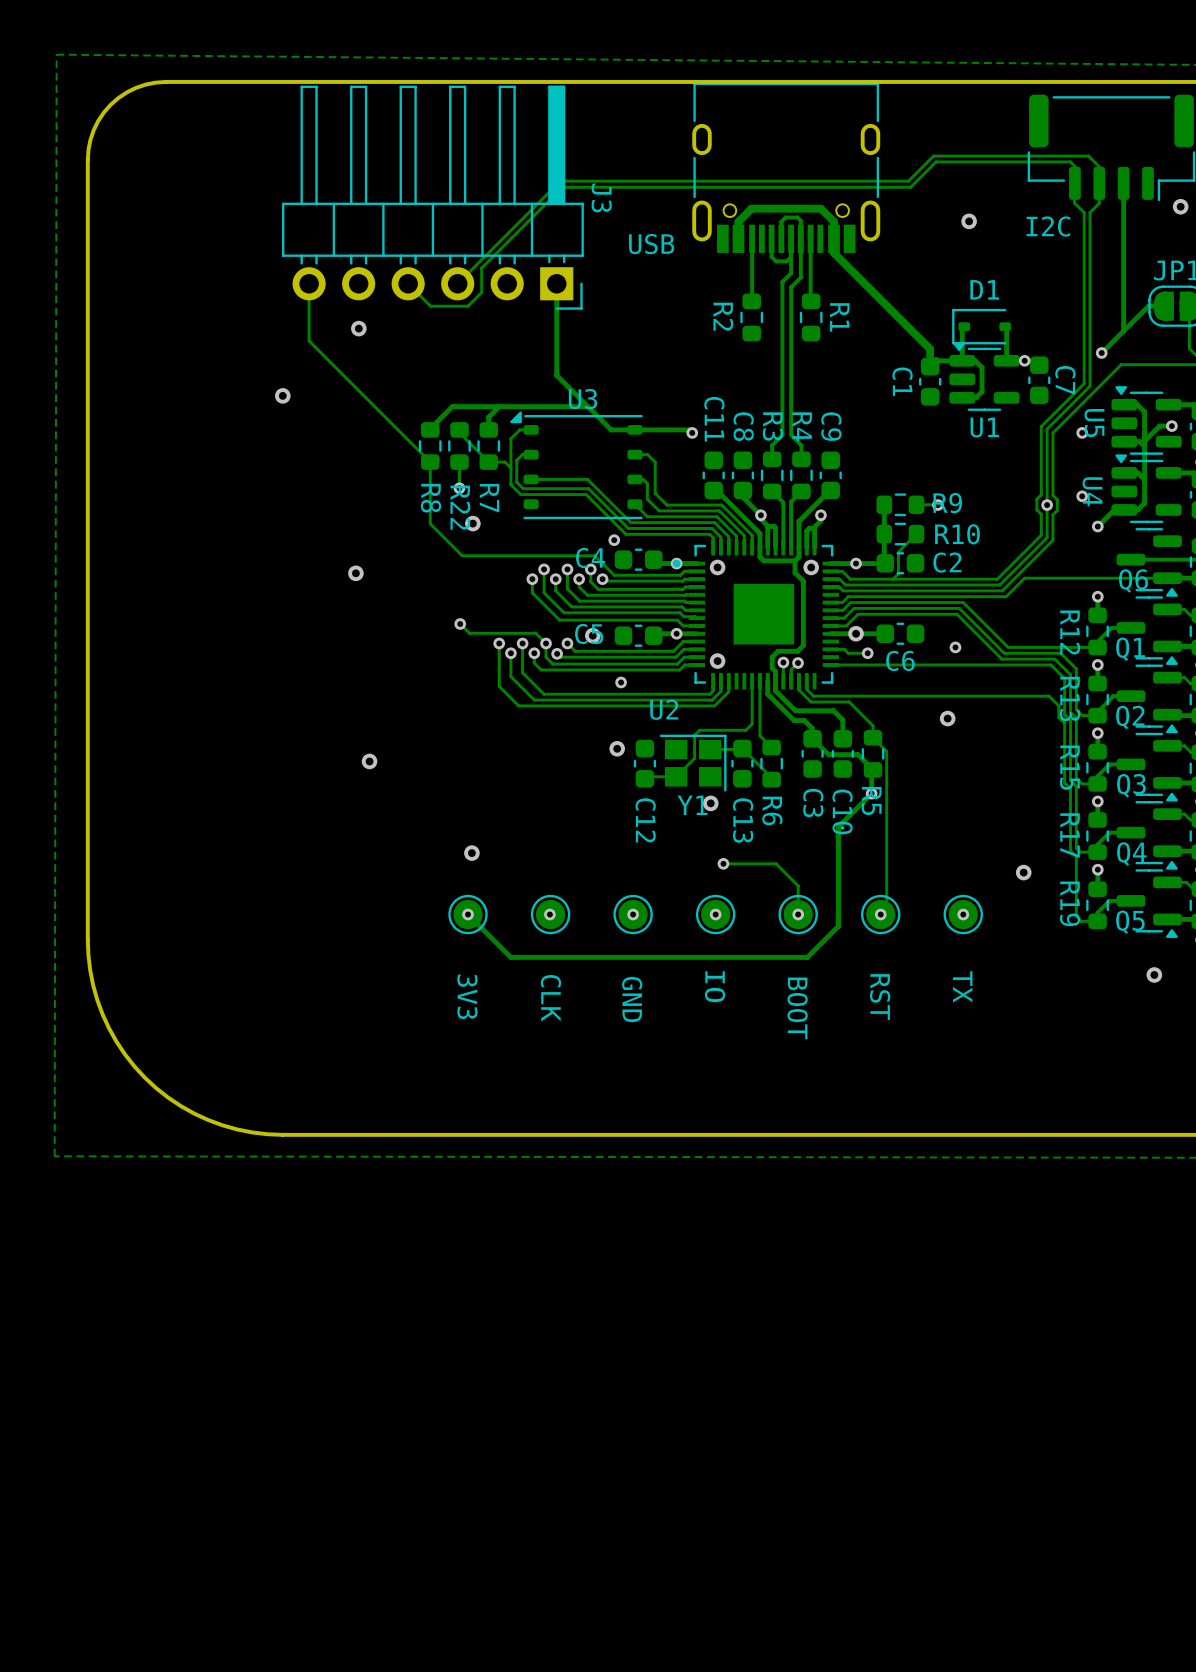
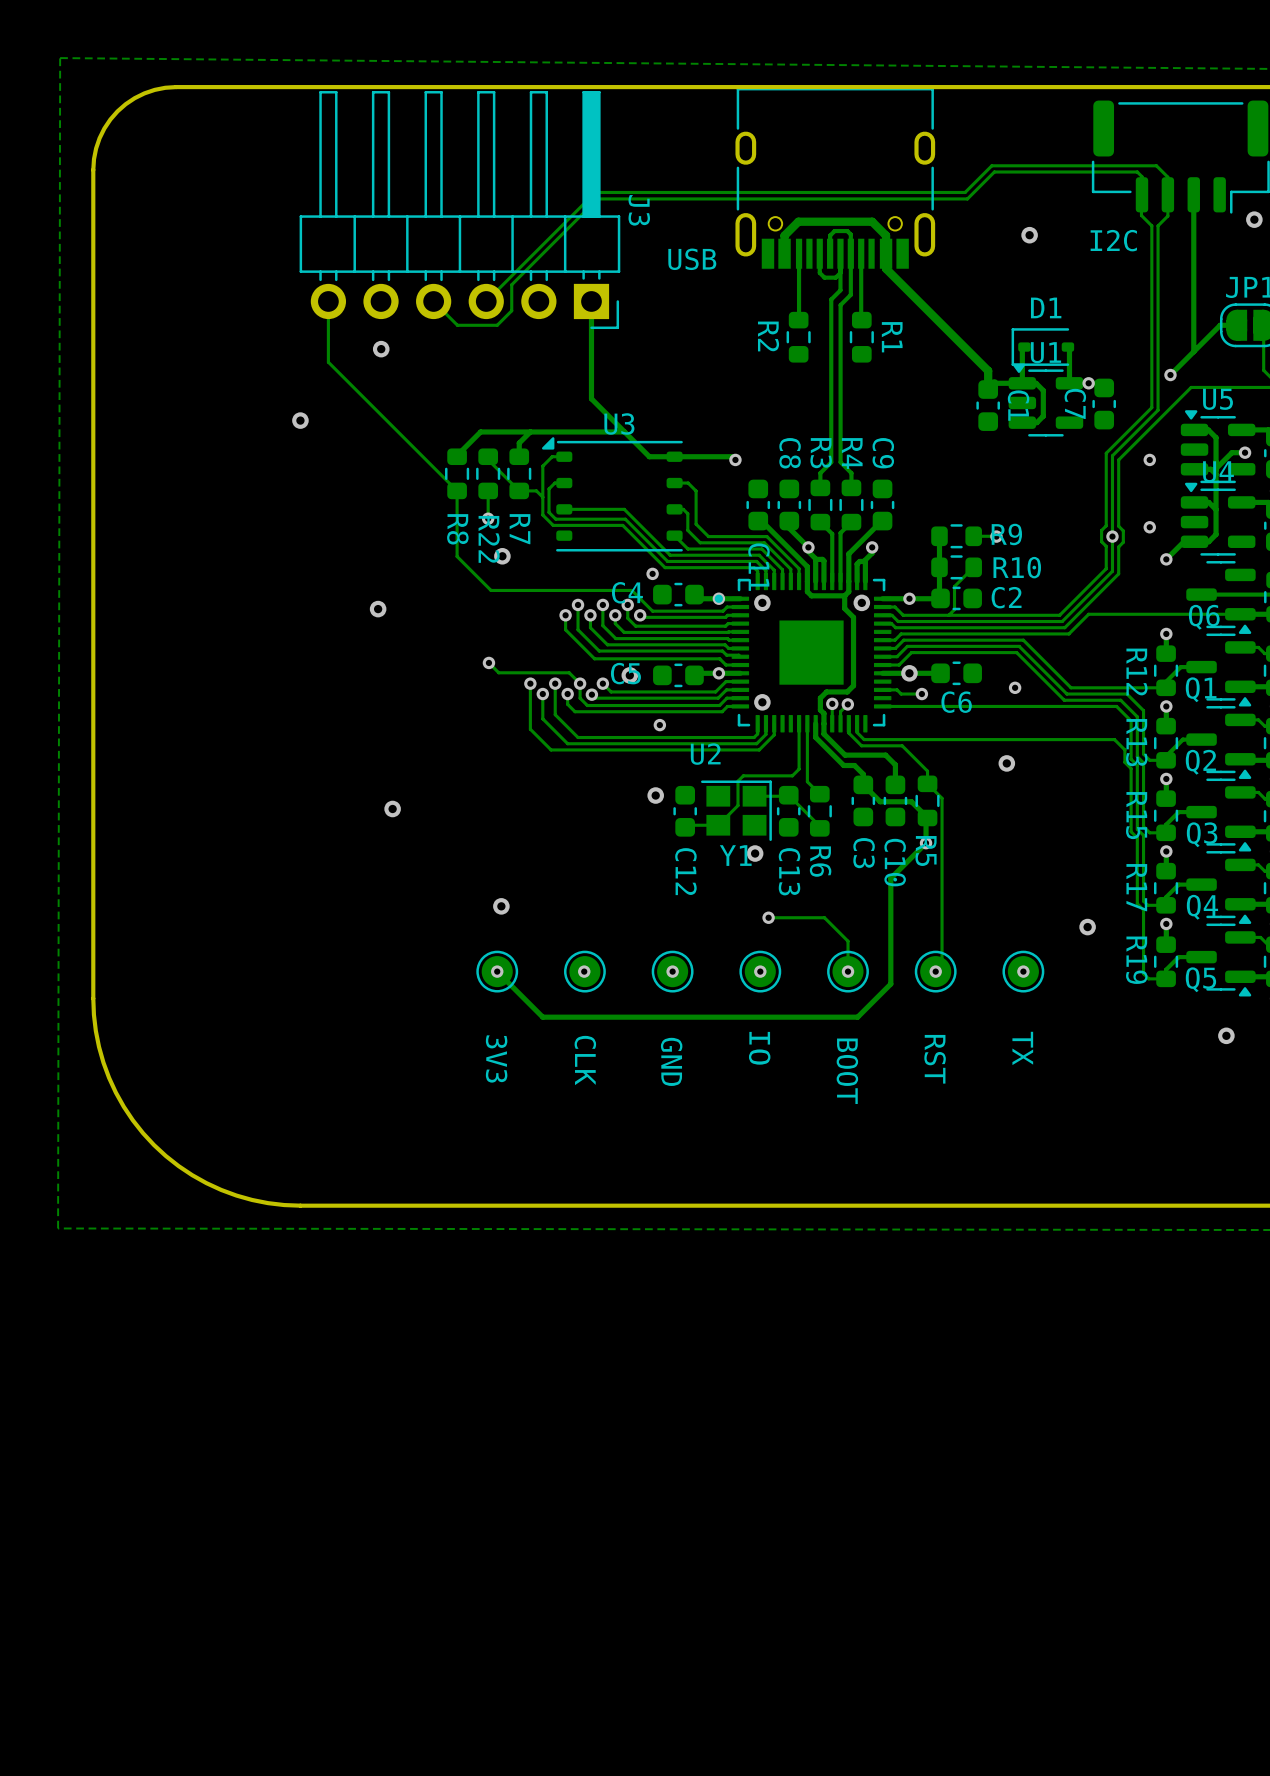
C7 name position: C7 (1065, 380) -> C7 (1075, 403)
C1 name position: C1 (902, 381) -> C1 (1018, 405)
C11 name position: C11 (714, 419) -> C11 (759, 567)
U5 name rotation: 0° (1094, 423) -> 90° counterclockwise (1217, 399)
U5 name position: U5 (1094, 423) -> U5 (1217, 399)
U1 name position: U1 (984, 427) -> U1 (1045, 352)
U4 name rotation: 0° (1092, 491) -> 90° counterclockwise (1218, 471)
U4 name position: U4 (1092, 491) -> U4 (1218, 471)

